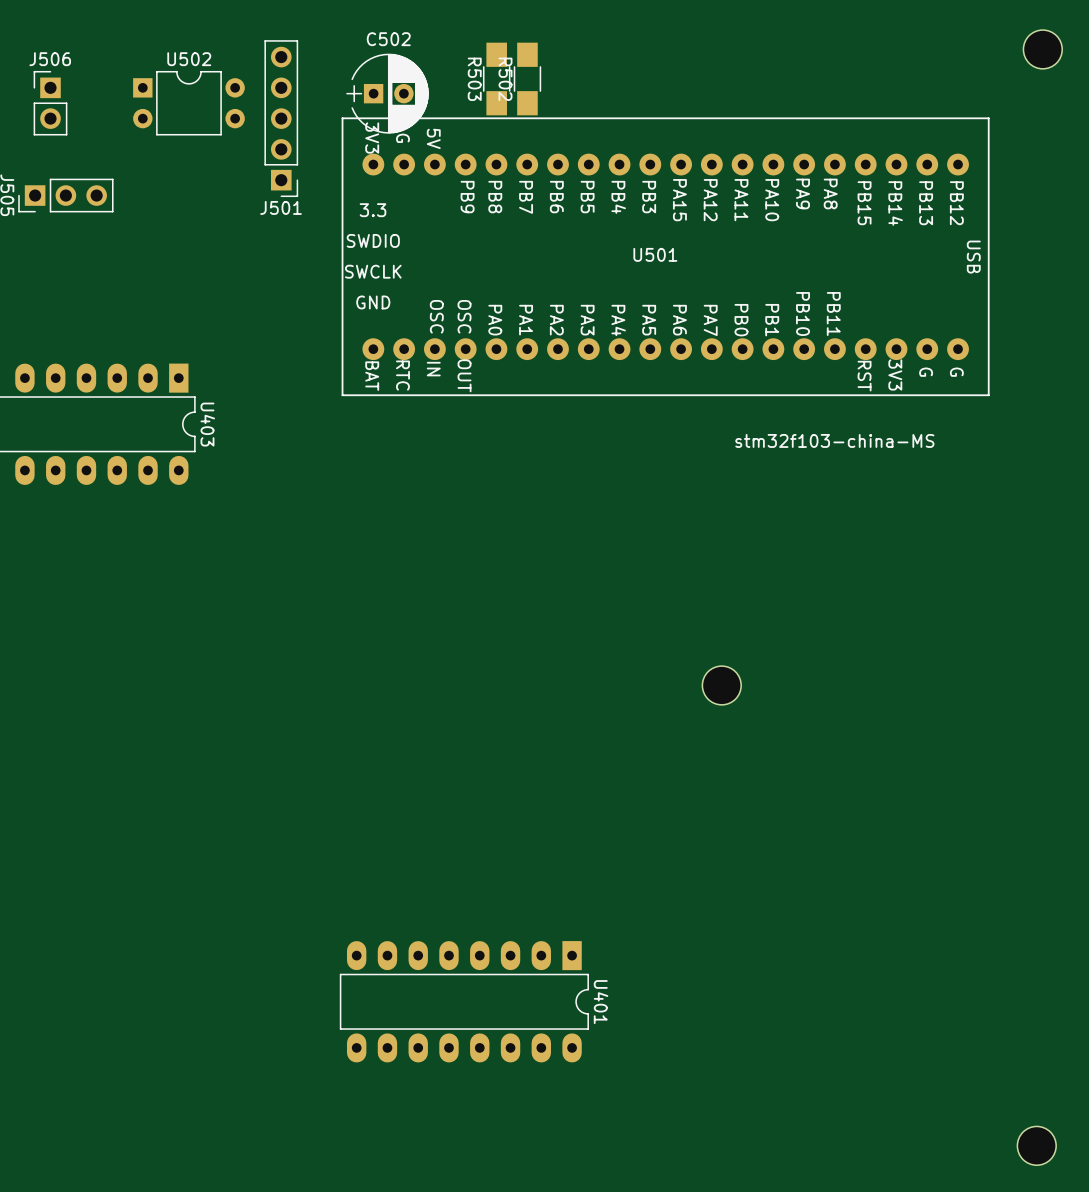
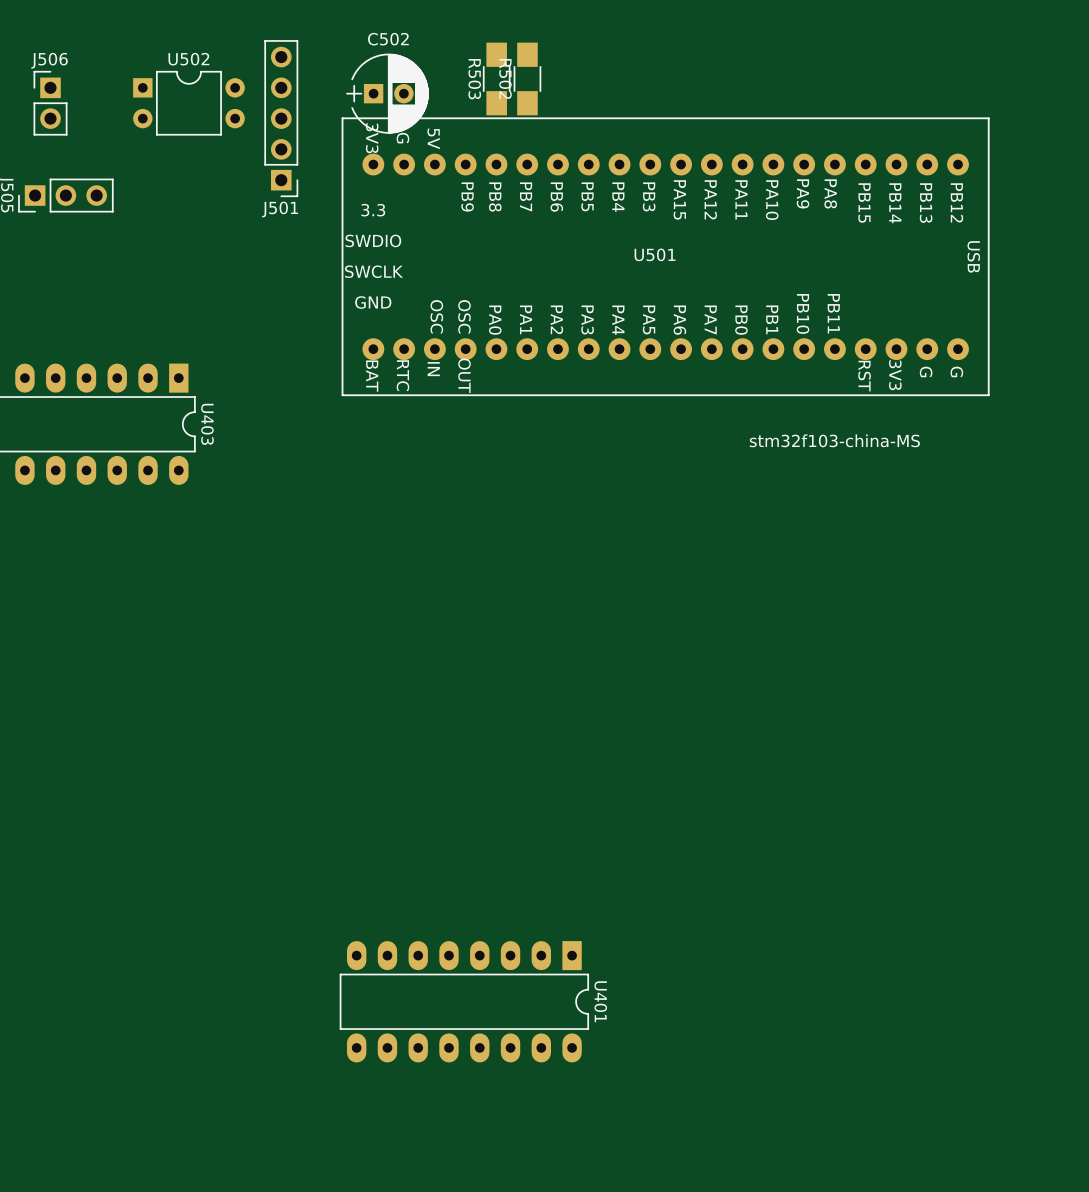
part: (1042, 49) -> none
part: (721, 685) -> none
part: (1036, 1145) -> none

